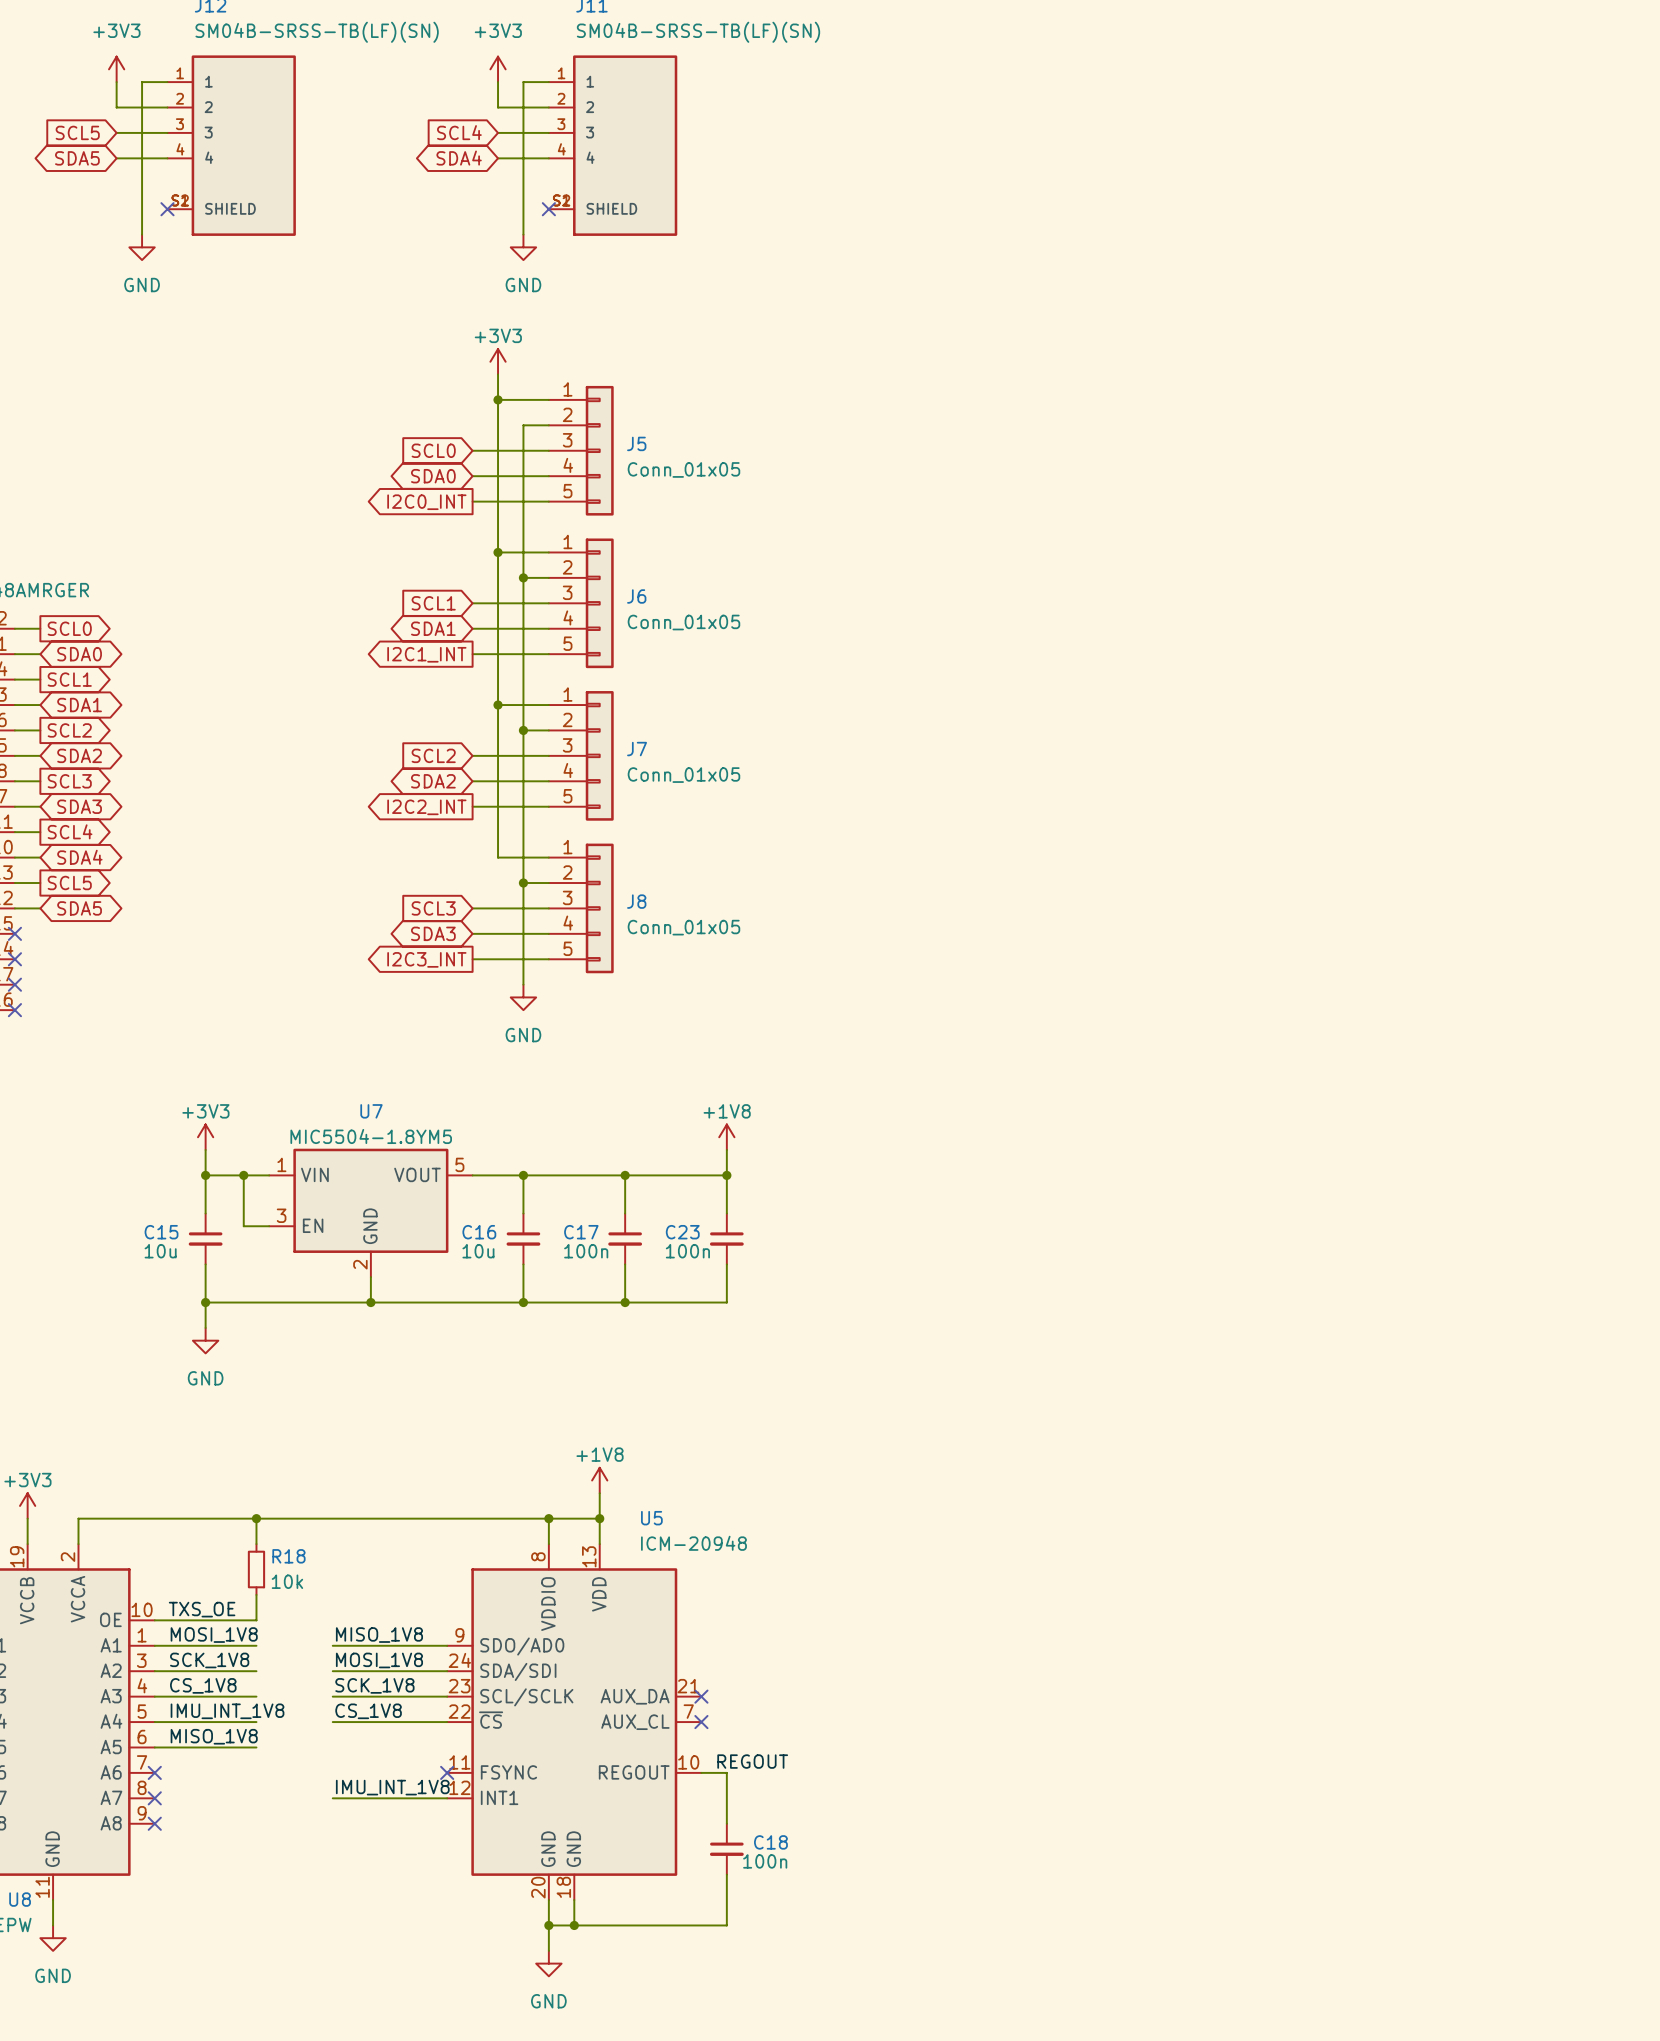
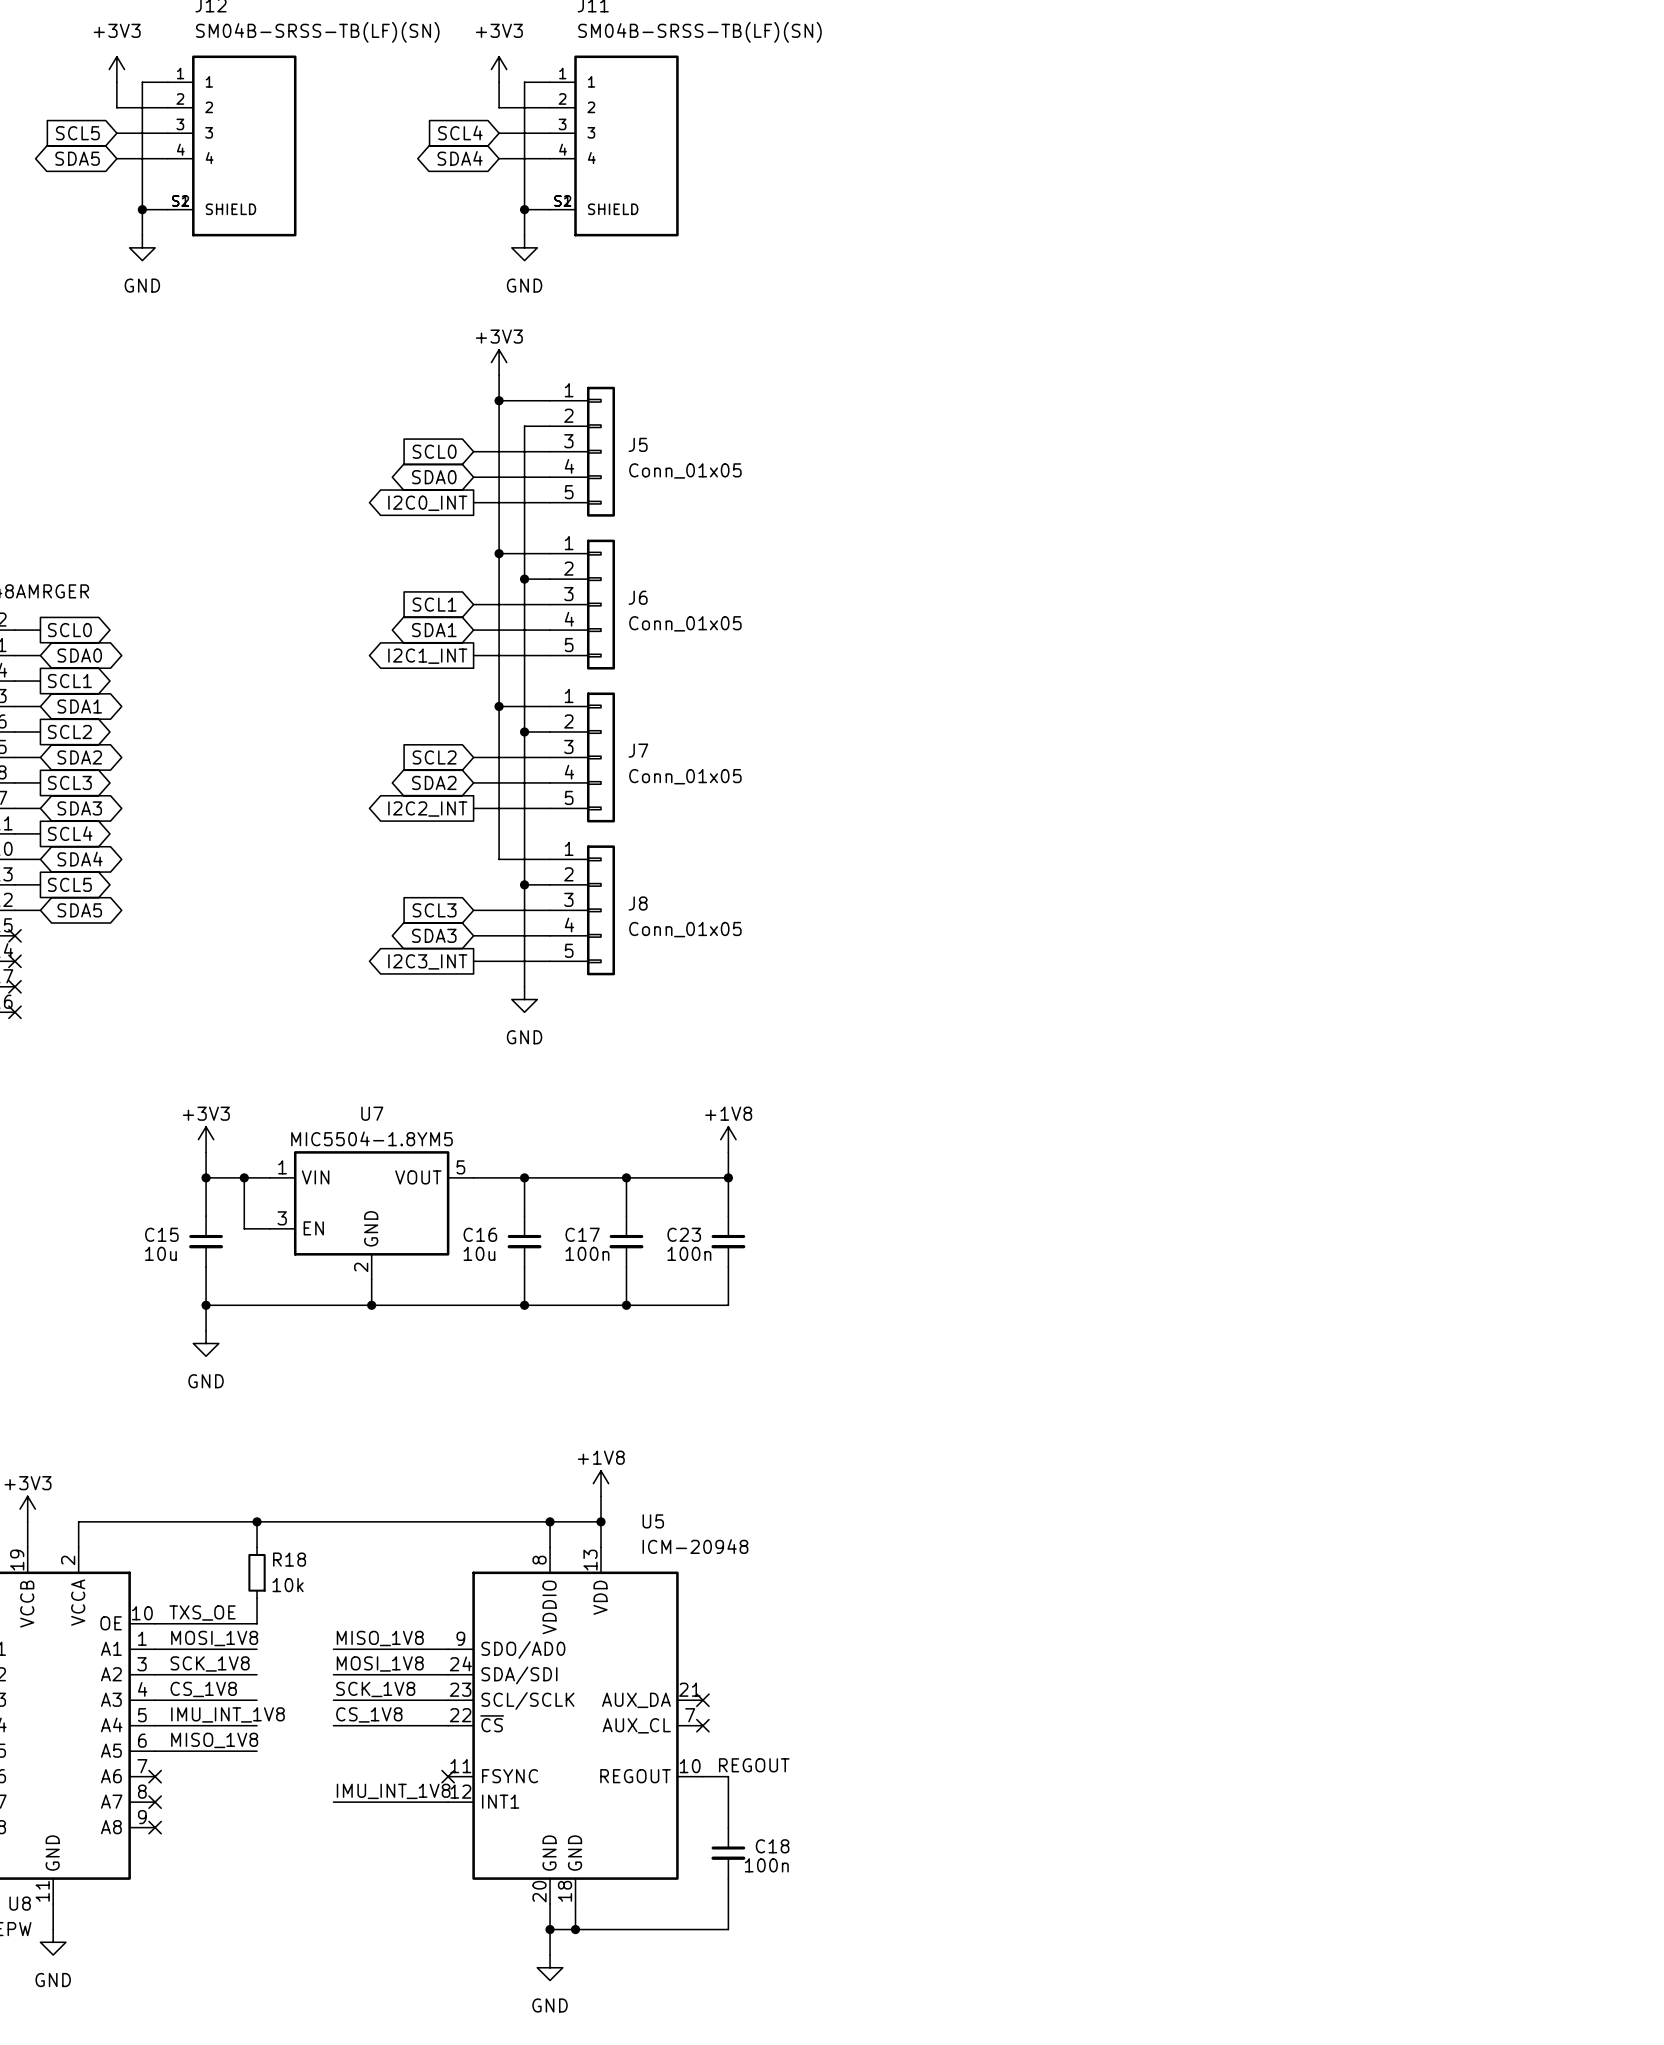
wire: none -> (142, 209) (167, 209)
junction: none -> (142, 209)
no-connect mark: (167, 209) -> none
wire: none -> (524, 209) (550, 209)
junction: none -> (524, 209)
no-connect mark: (548, 209) -> none

